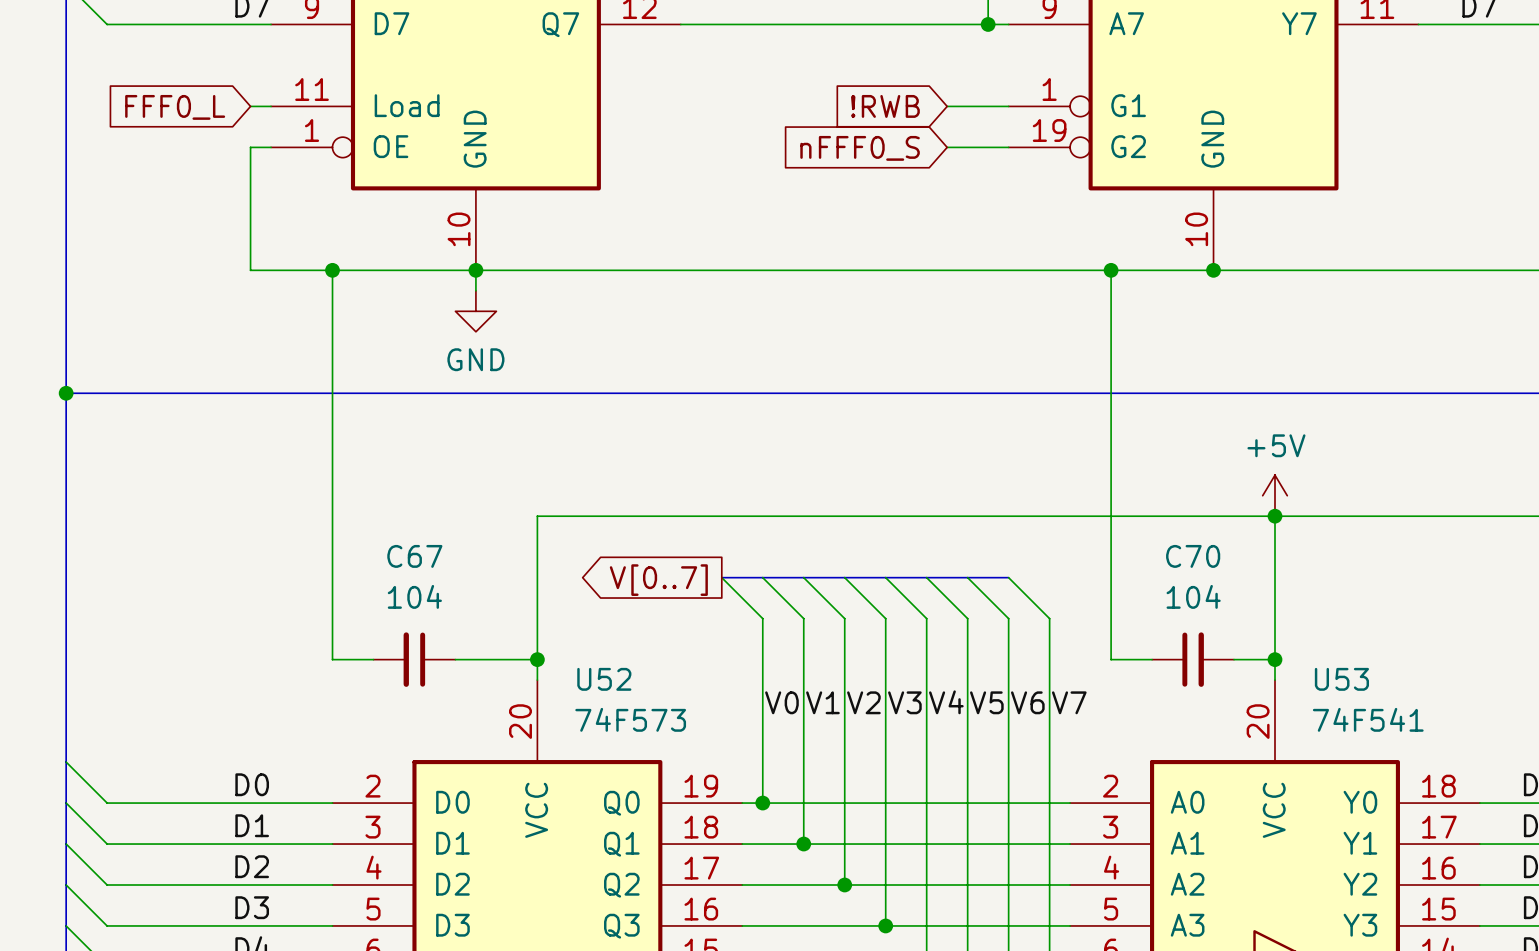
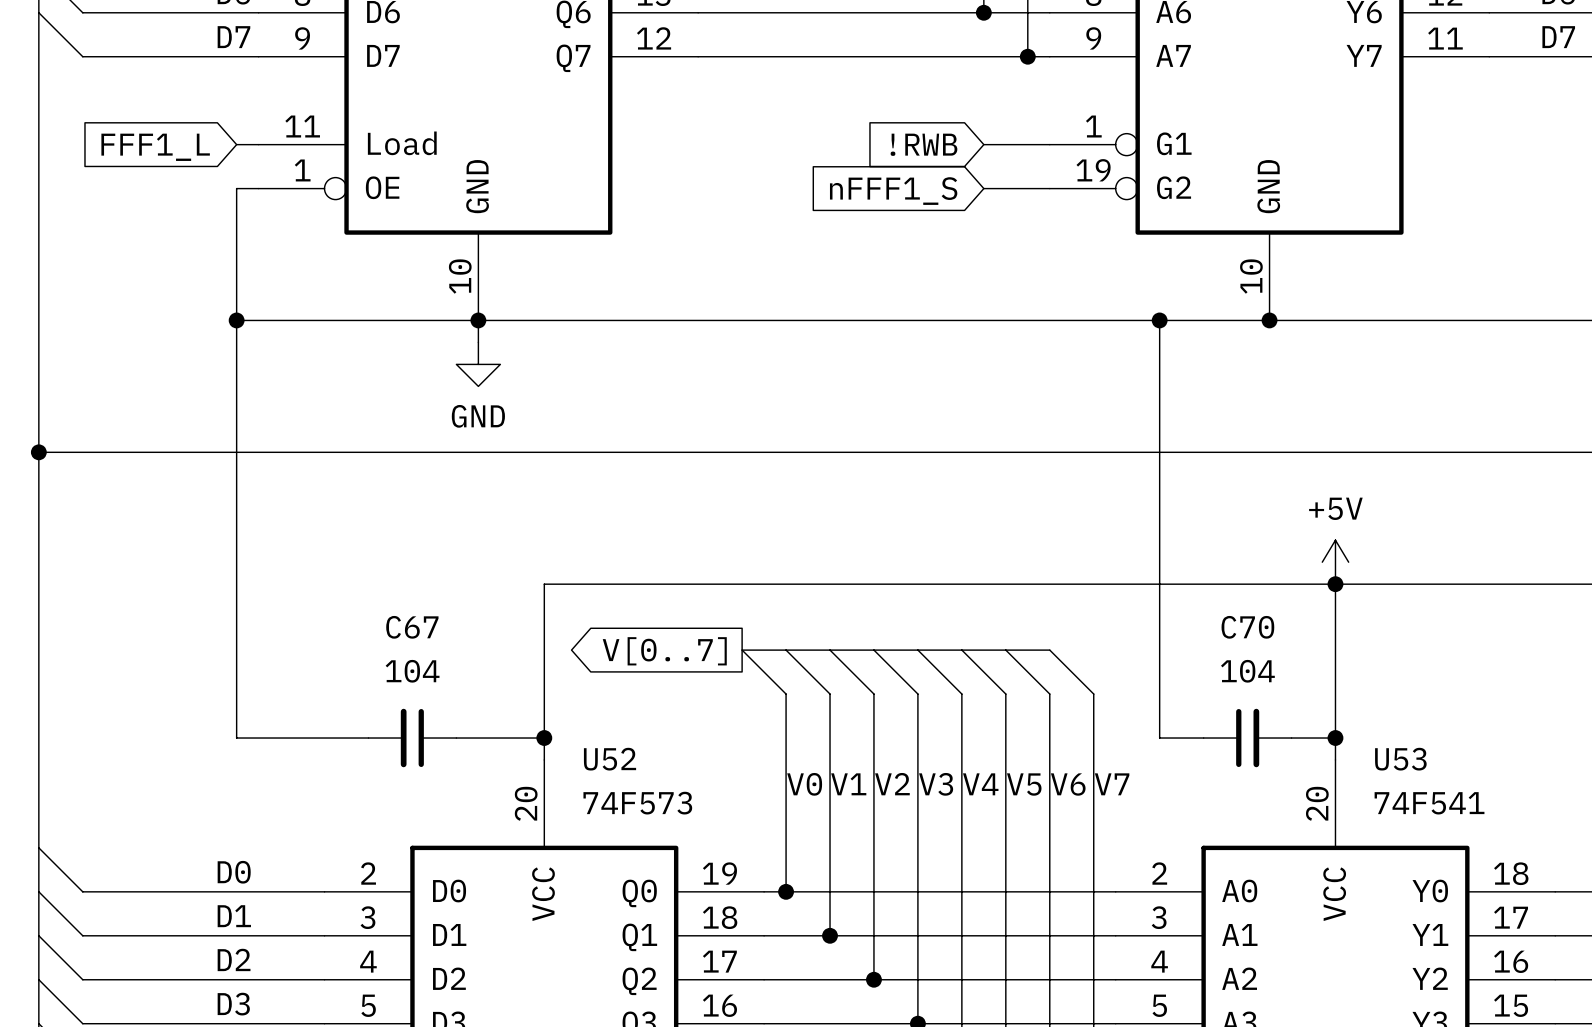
global label: FFF0_L (175, 107) -> FFF1_L (155, 147)
global label: nFFF0_S (860, 148) -> nFFF1_S (893, 191)
wire: (332, 270) (332, 659) -> (236, 320) (236, 738) (324, 738)
junction position: (332, 270) -> (236, 320)

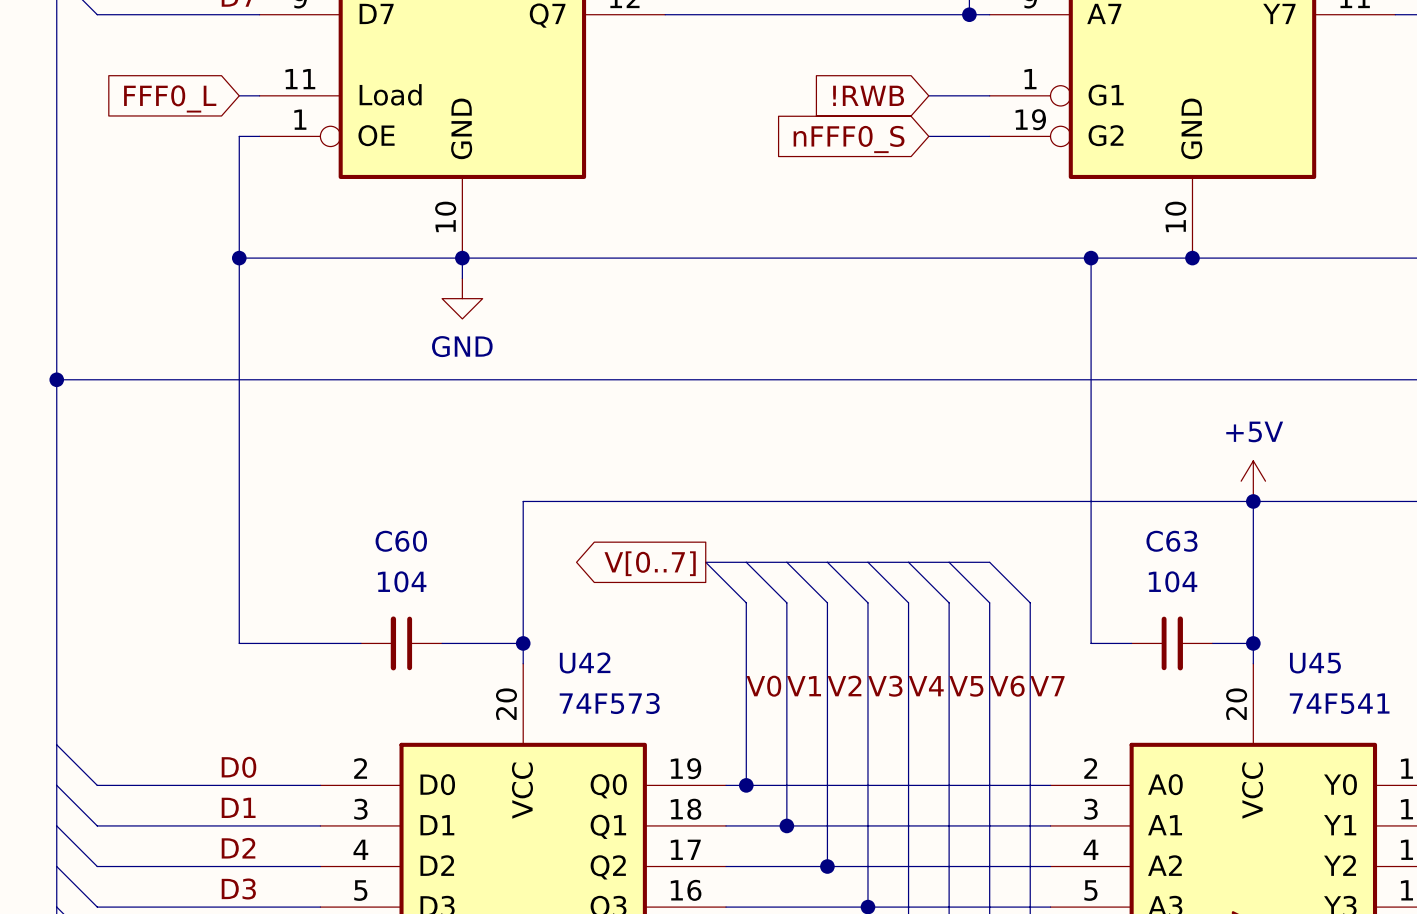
global label: FFF1_L (155, 147) -> FFF0_L (170, 98)
global label: nFFF1_S (893, 191) -> nFFF0_S (849, 139)
C67 name: C67 (412, 627) -> C60 (401, 541)
C70 name: C70 (1247, 627) -> C63 (1171, 541)
U52 name: U52 (610, 759) -> U42 (585, 662)
U53 name: U53 (1400, 759) -> U45 (1315, 663)

